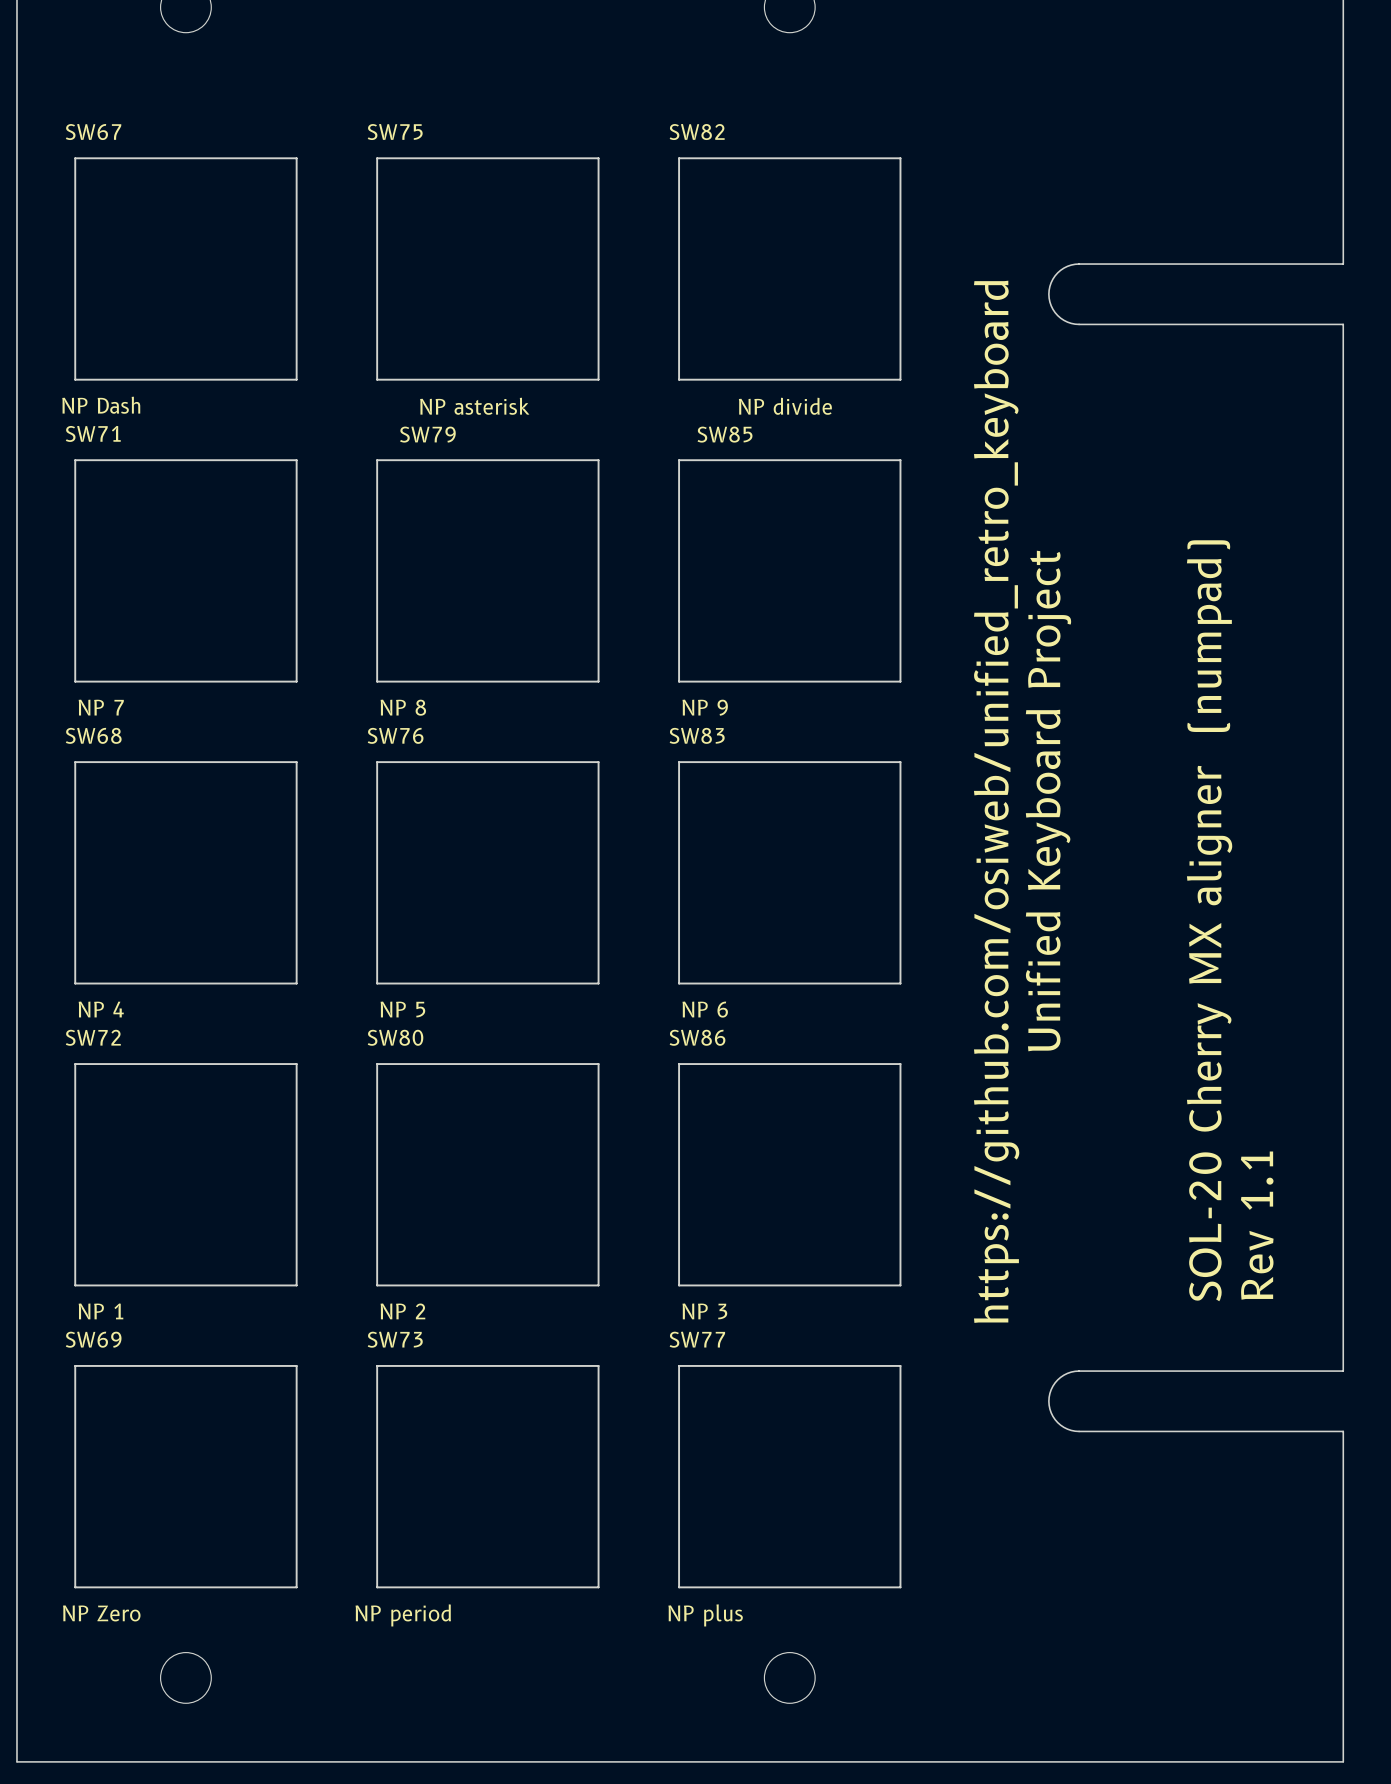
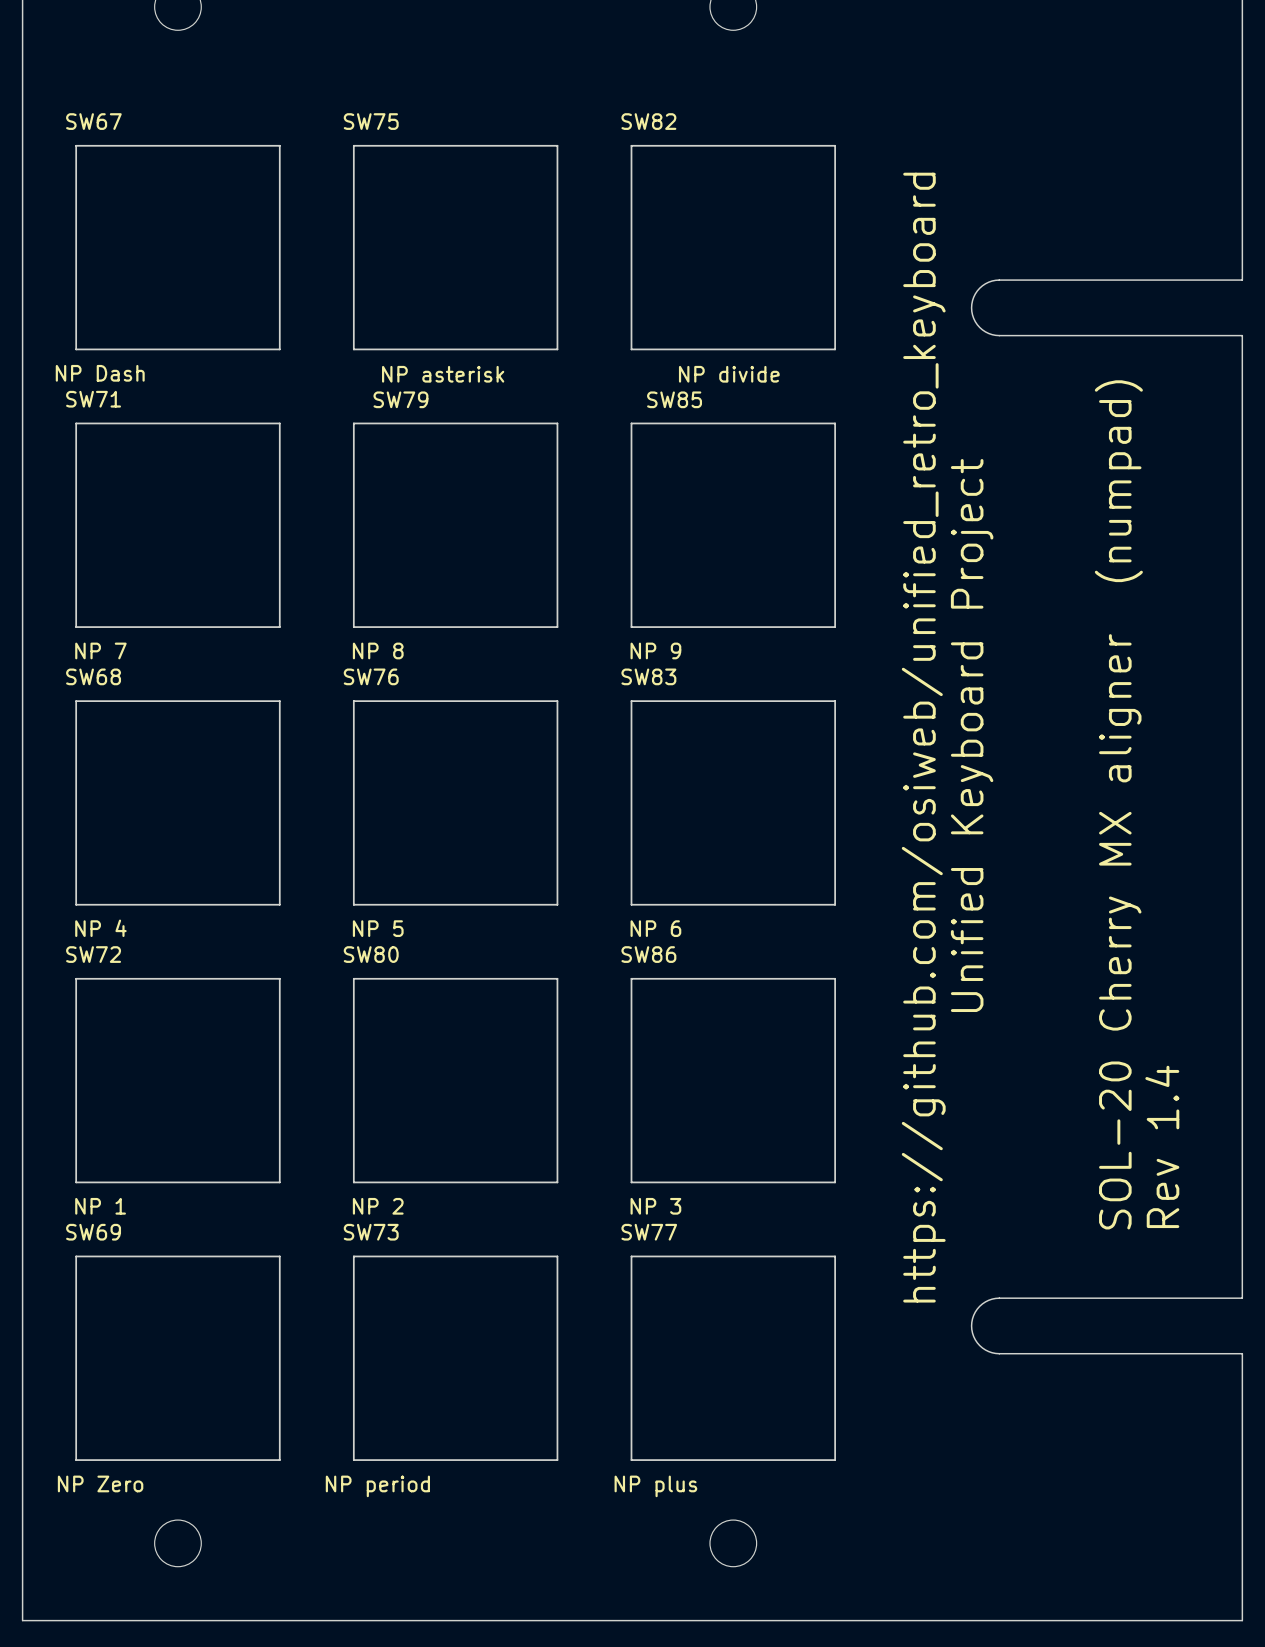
board edge: (1343, 264) (1075, 264) (1063, 268) (1055, 275) (1051, 282) (1048, 294) (1051, 305) (1057, 315) (1063, 320) (1075, 324) (1343, 324) (1343, 364) -> (1242, 280) (995, 280) (985, 283) (977, 290) (971, 307) (973, 318) (979, 327) (995, 335) (1242, 335)
board edge: none -> (1242, 243) (1242, 280)
text position: SOL-20 Cherry MX aligner (numpad) (1209, 920) -> SOL-20 Cherry MX aligner (numpad) (1118, 804)
text: Rev 1.1 (1257, 1225) -> Rev 1.4 (1162, 1146)
board edge: (1343, 1371) (1075, 1371) (1063, 1375) (1055, 1382) (1051, 1389) (1048, 1401) (1051, 1412) (1057, 1422) (1063, 1427) (1075, 1431) (1343, 1431) -> (1242, 1261) (1242, 1298) (995, 1298) (985, 1301) (977, 1309) (971, 1325) (973, 1336) (979, 1345) (995, 1353) (1242, 1353)
board edge: (1343, 1431) (1343, 1471) -> none

